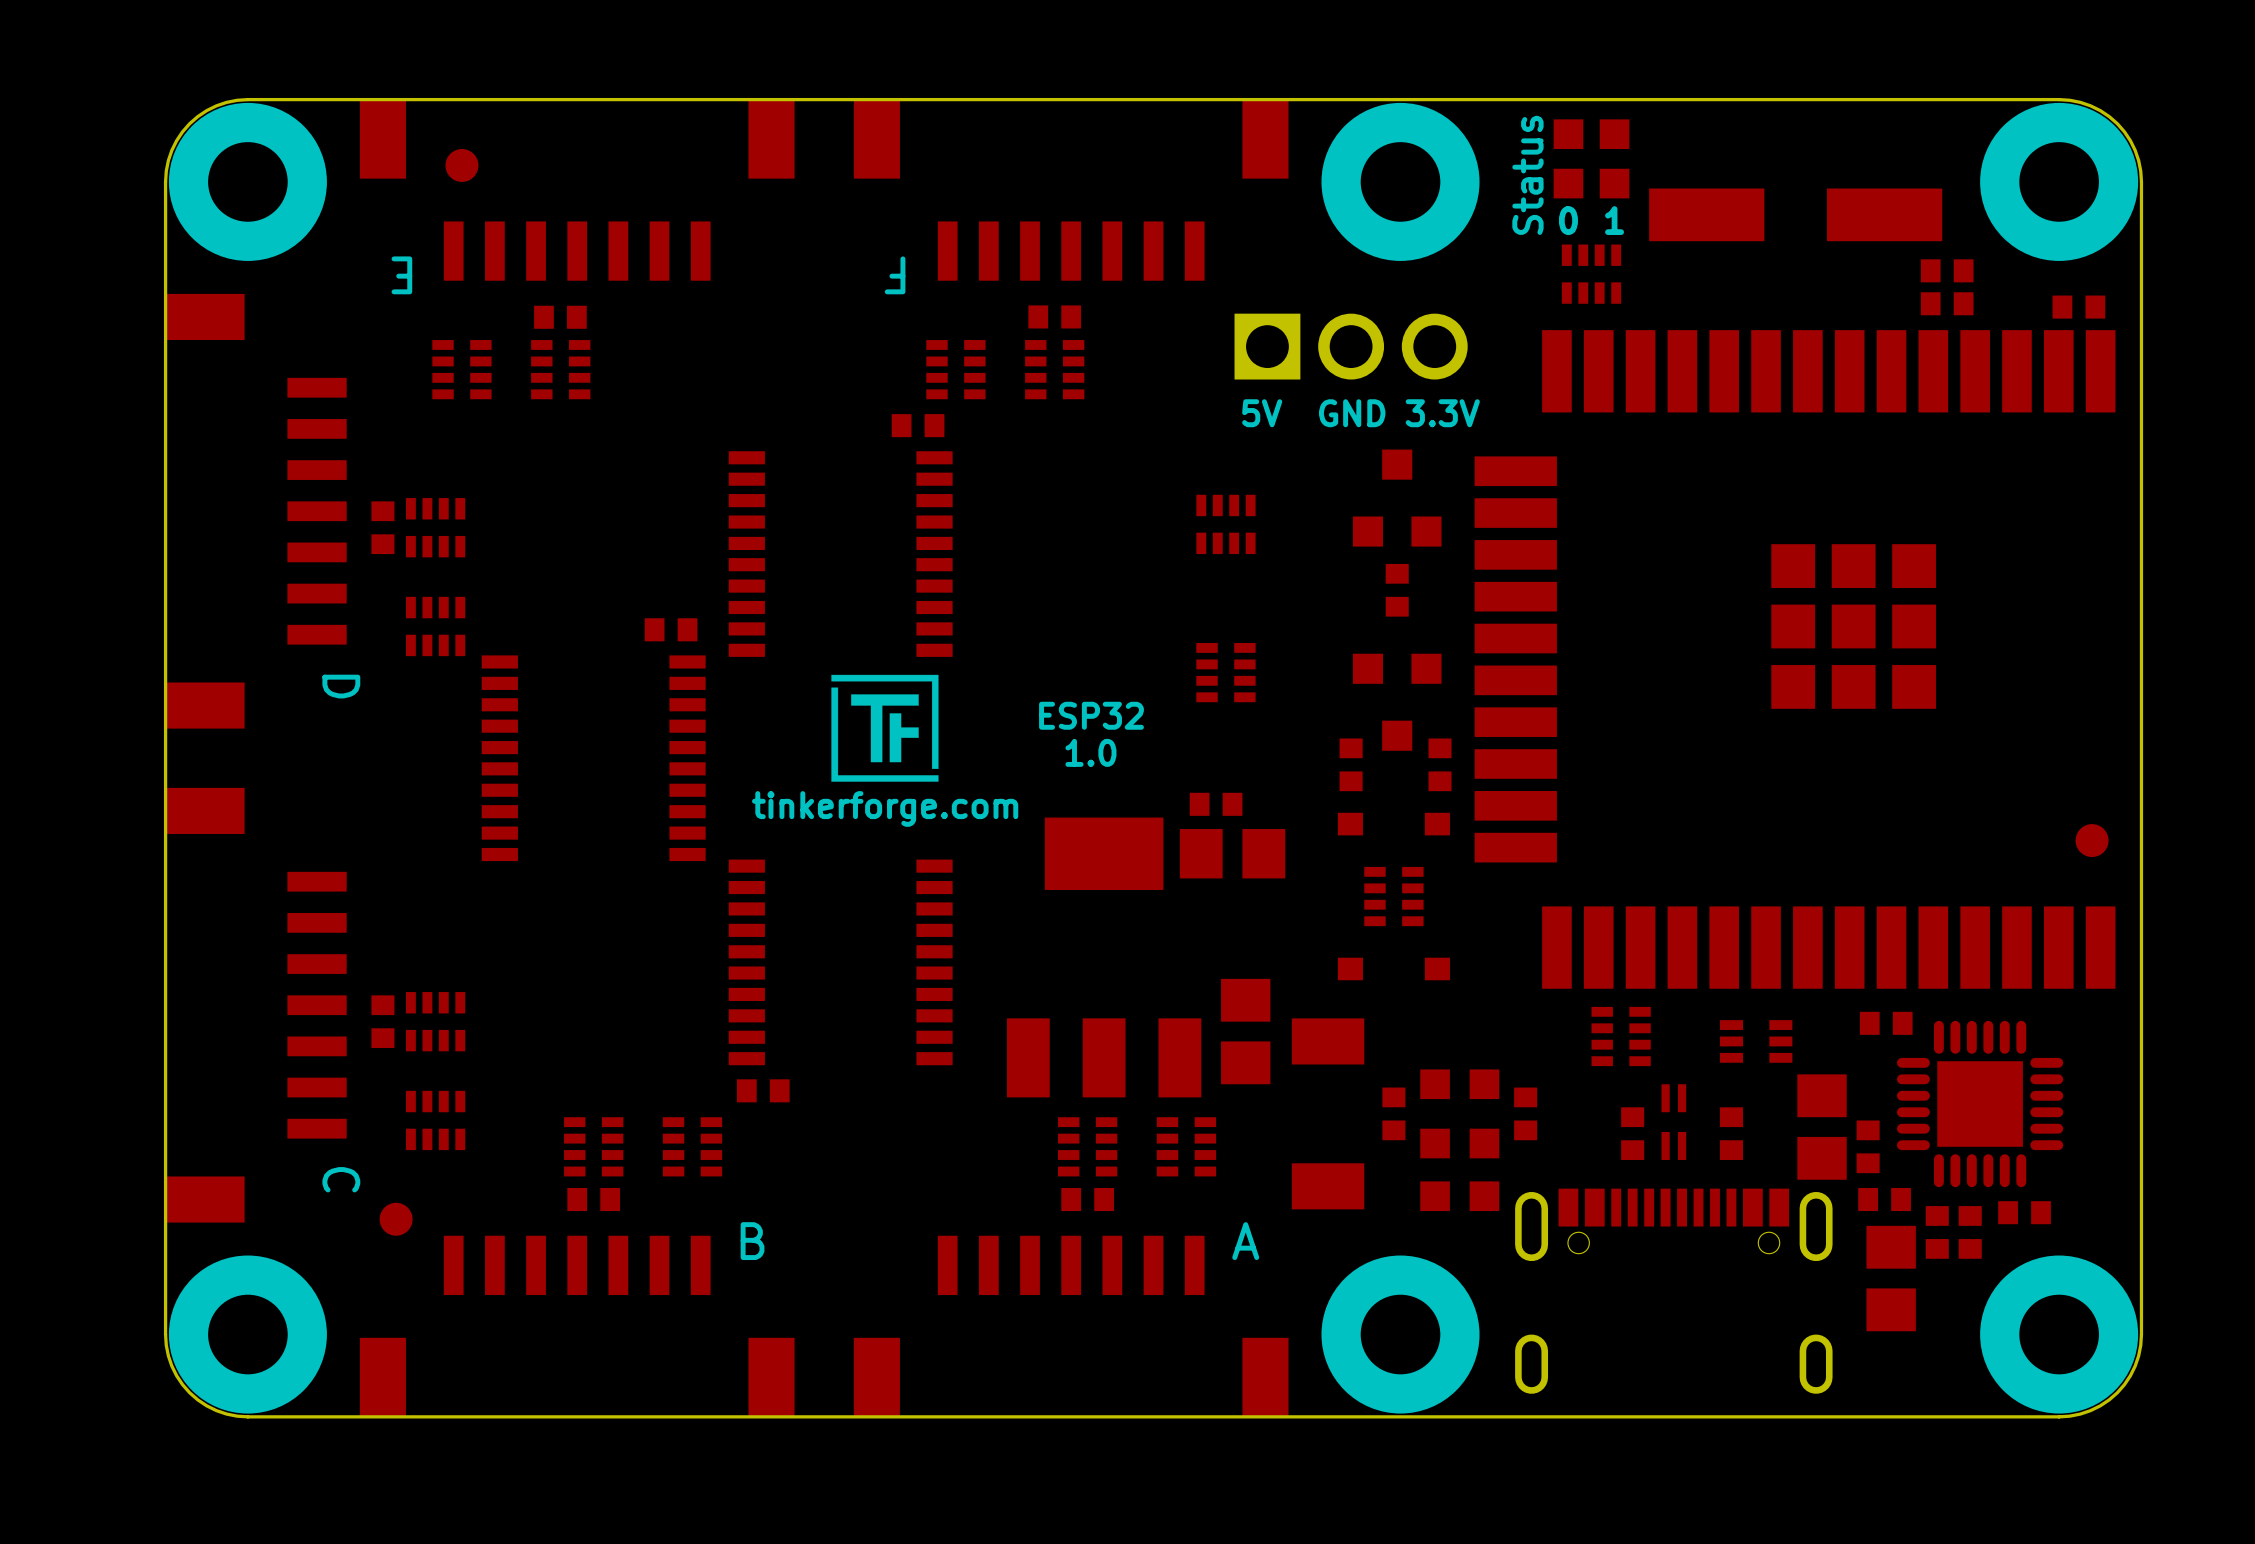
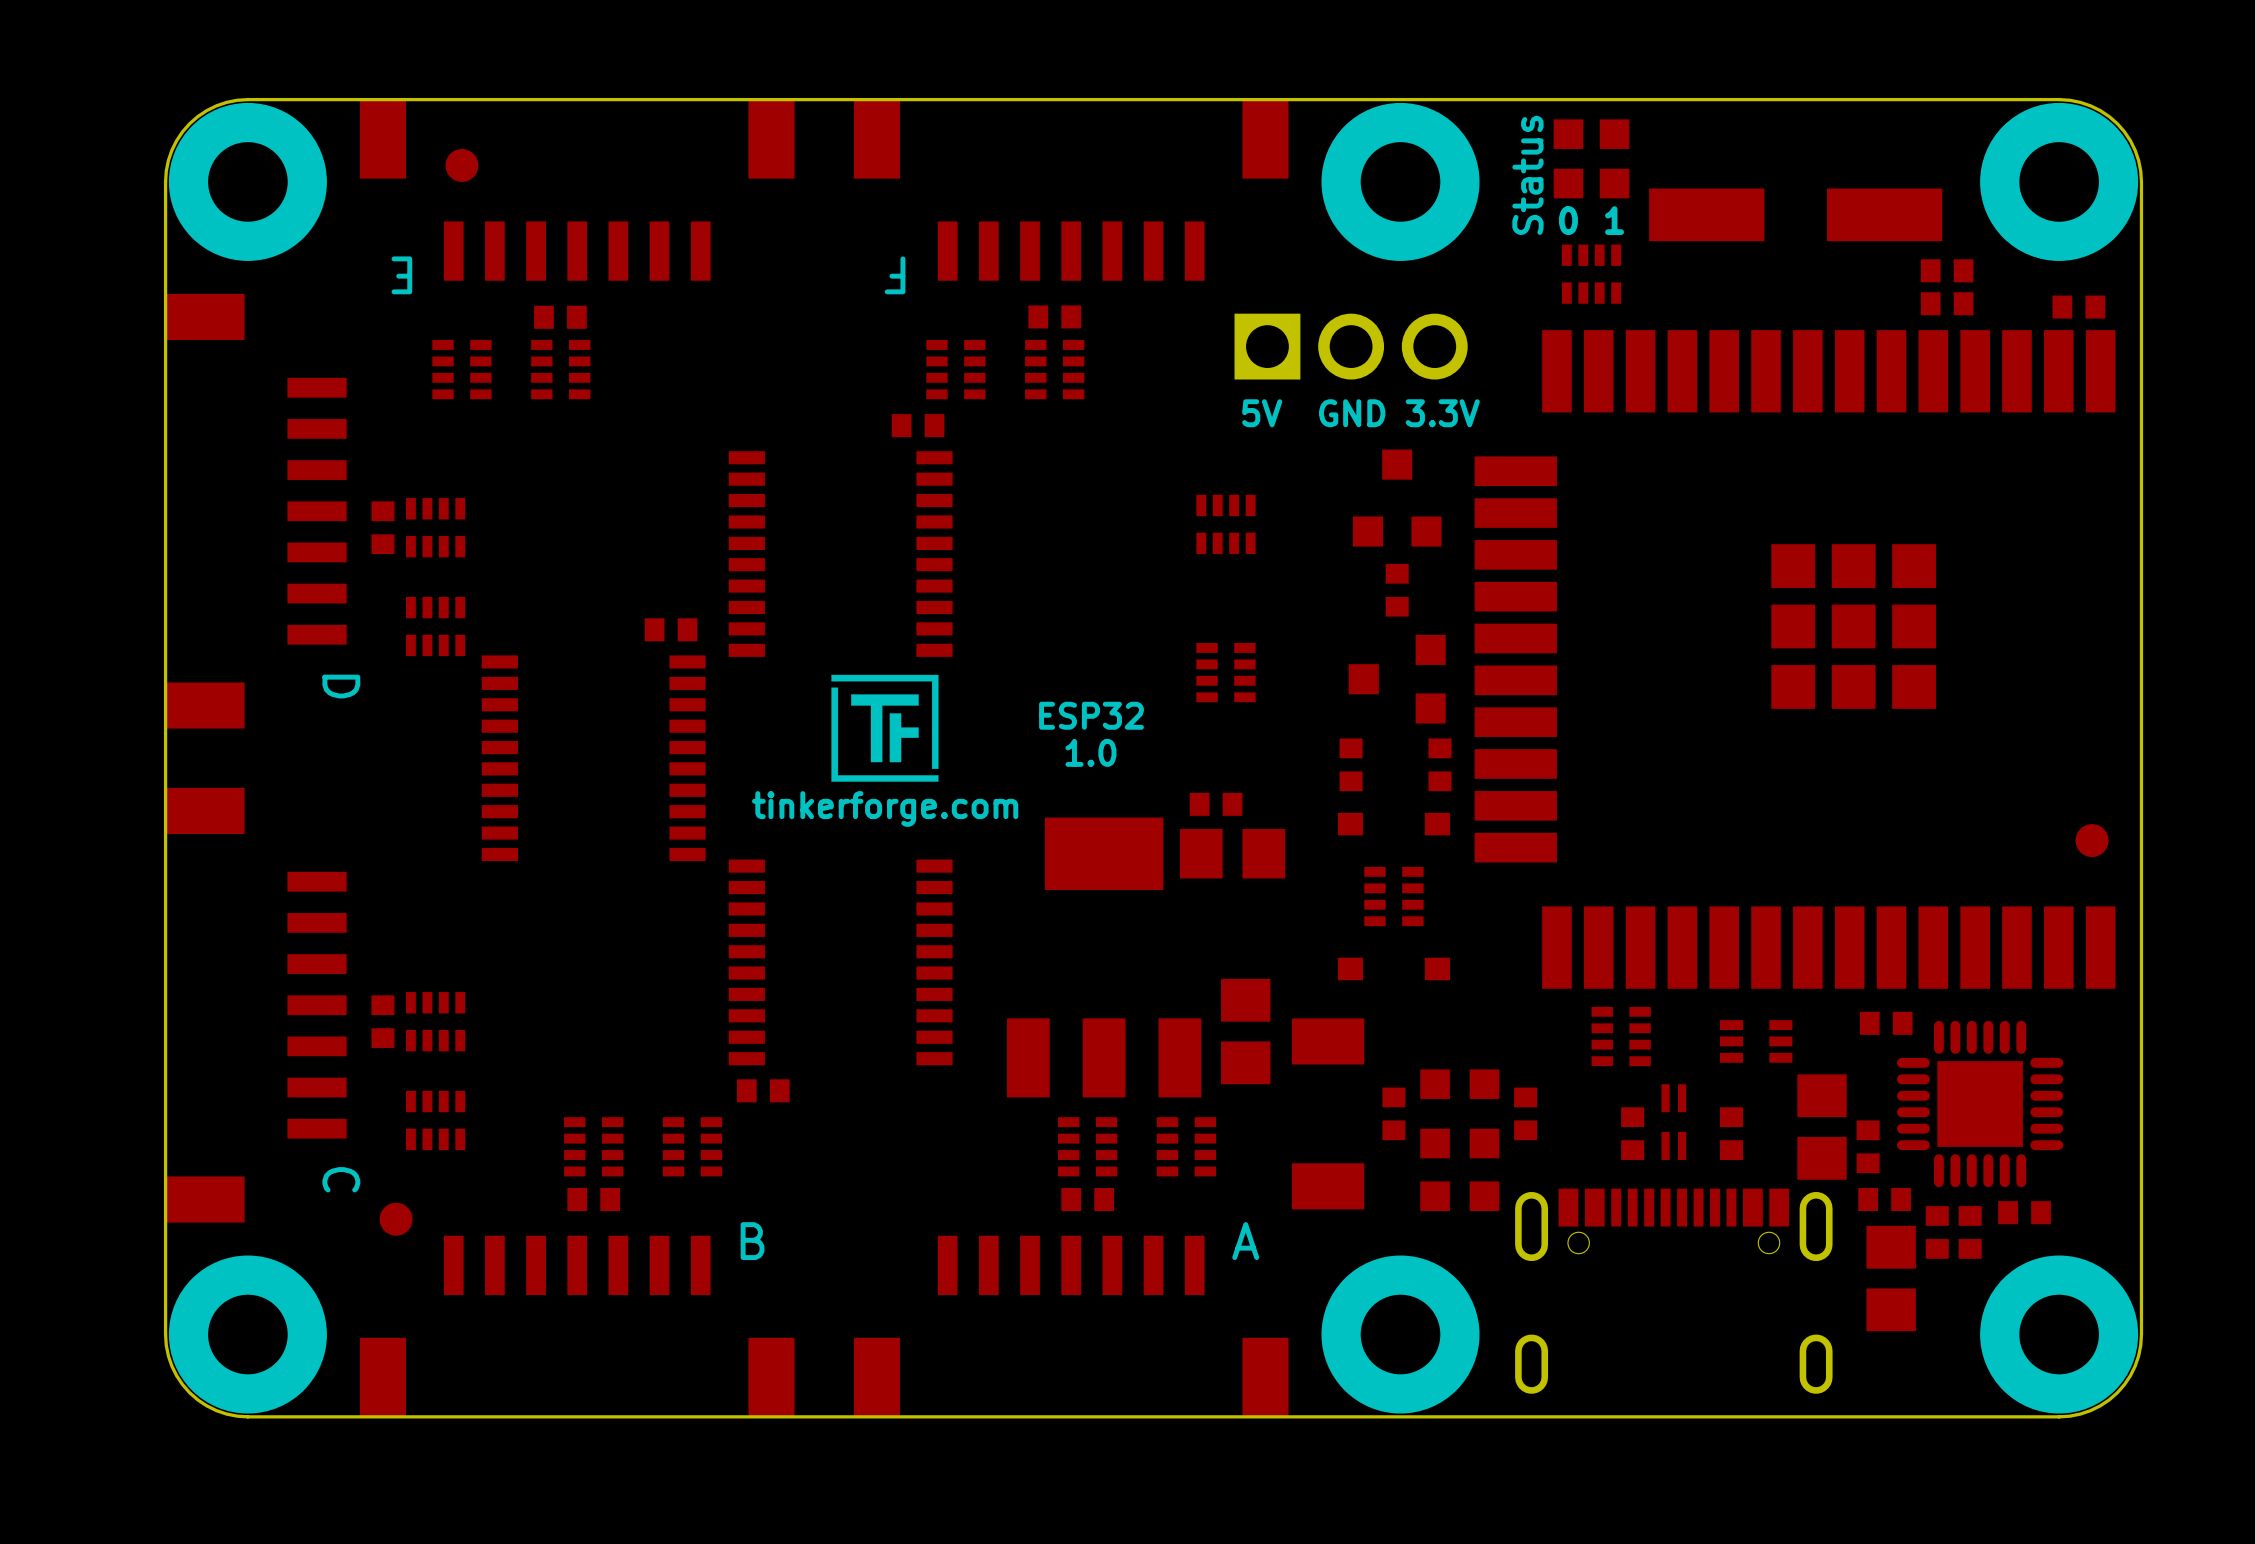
part rotation: 0° (1397, 702) -> 90° clockwise (1397, 679)

